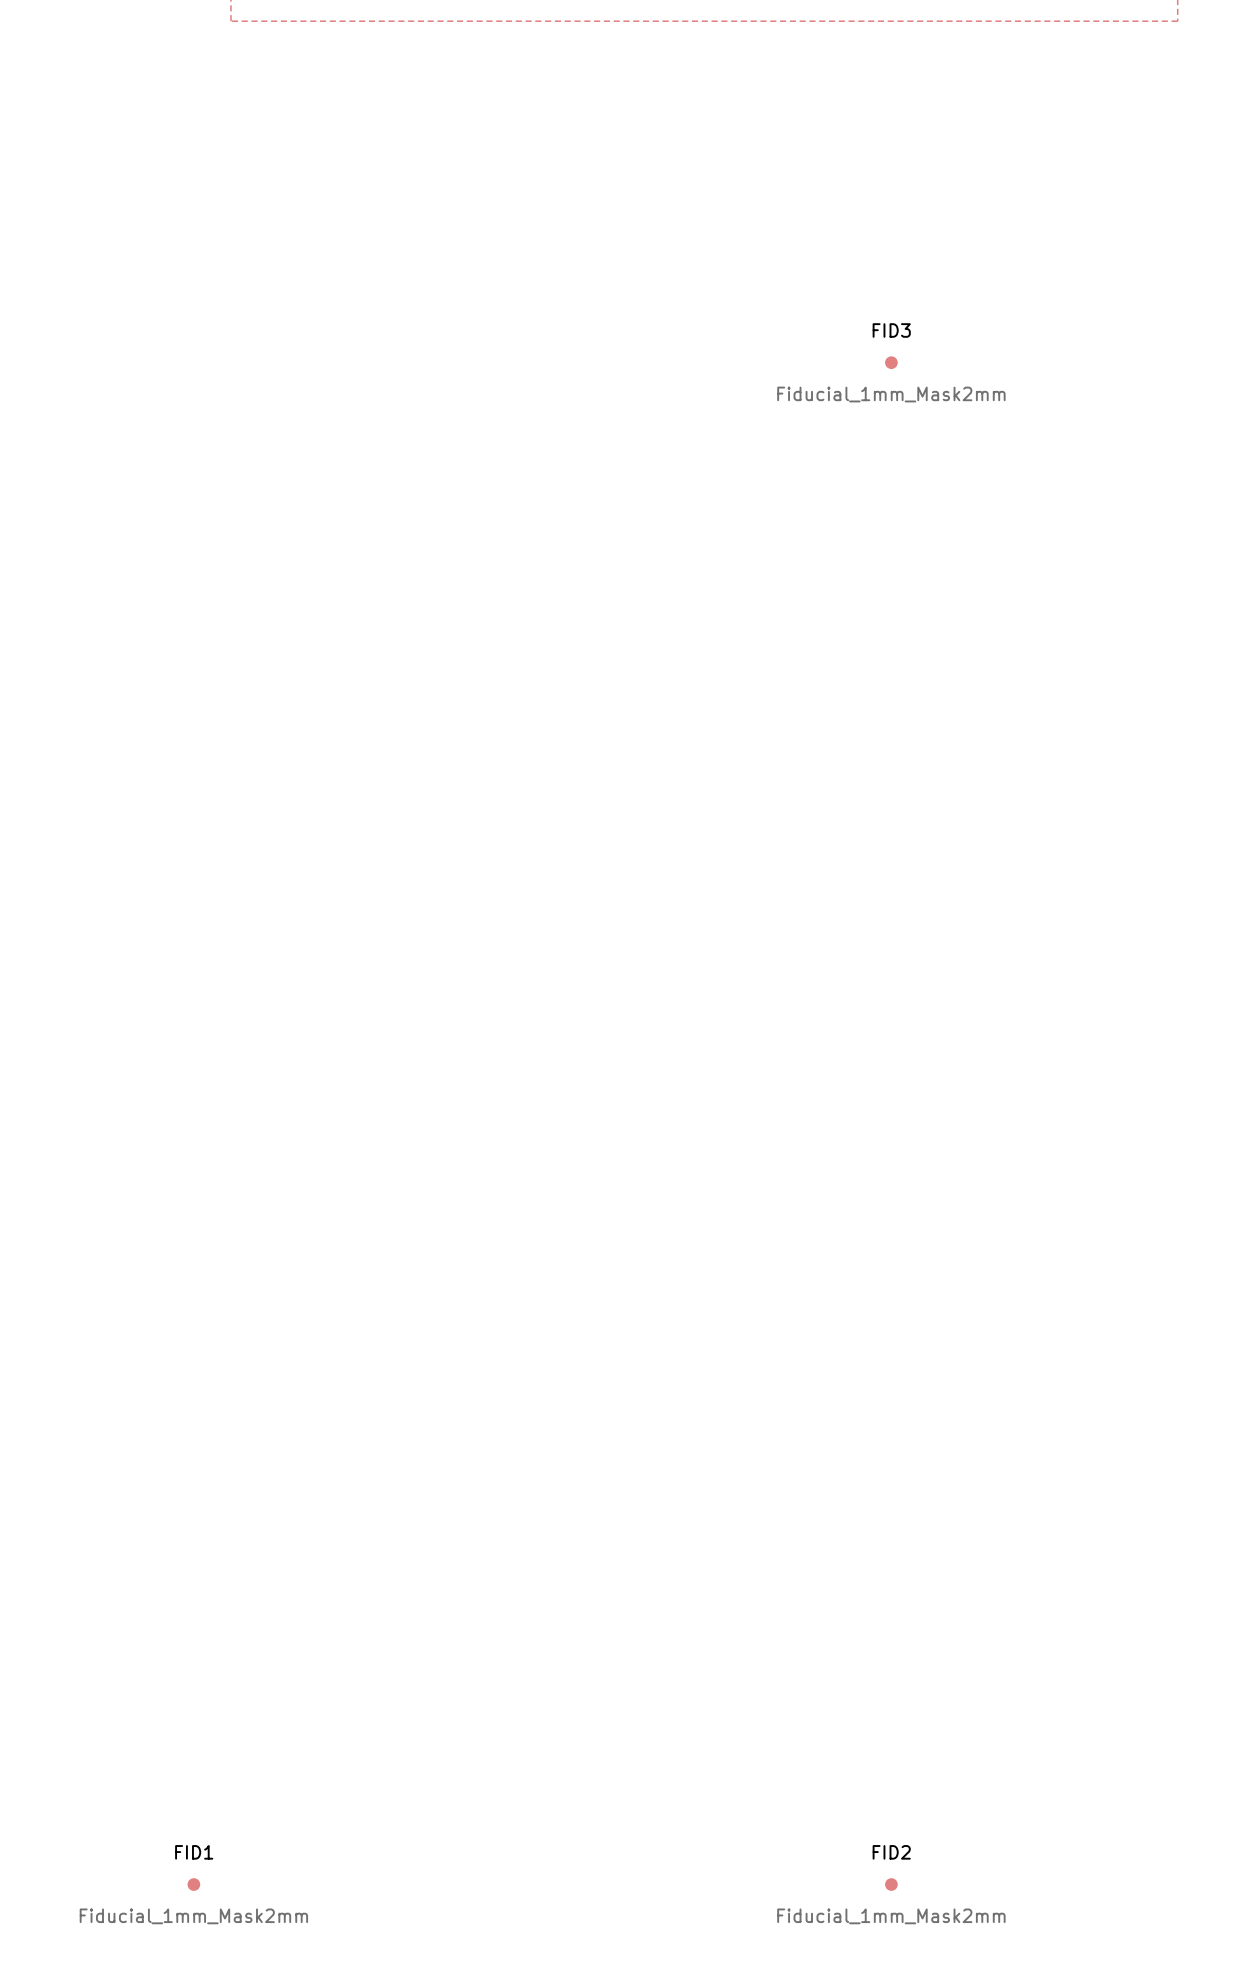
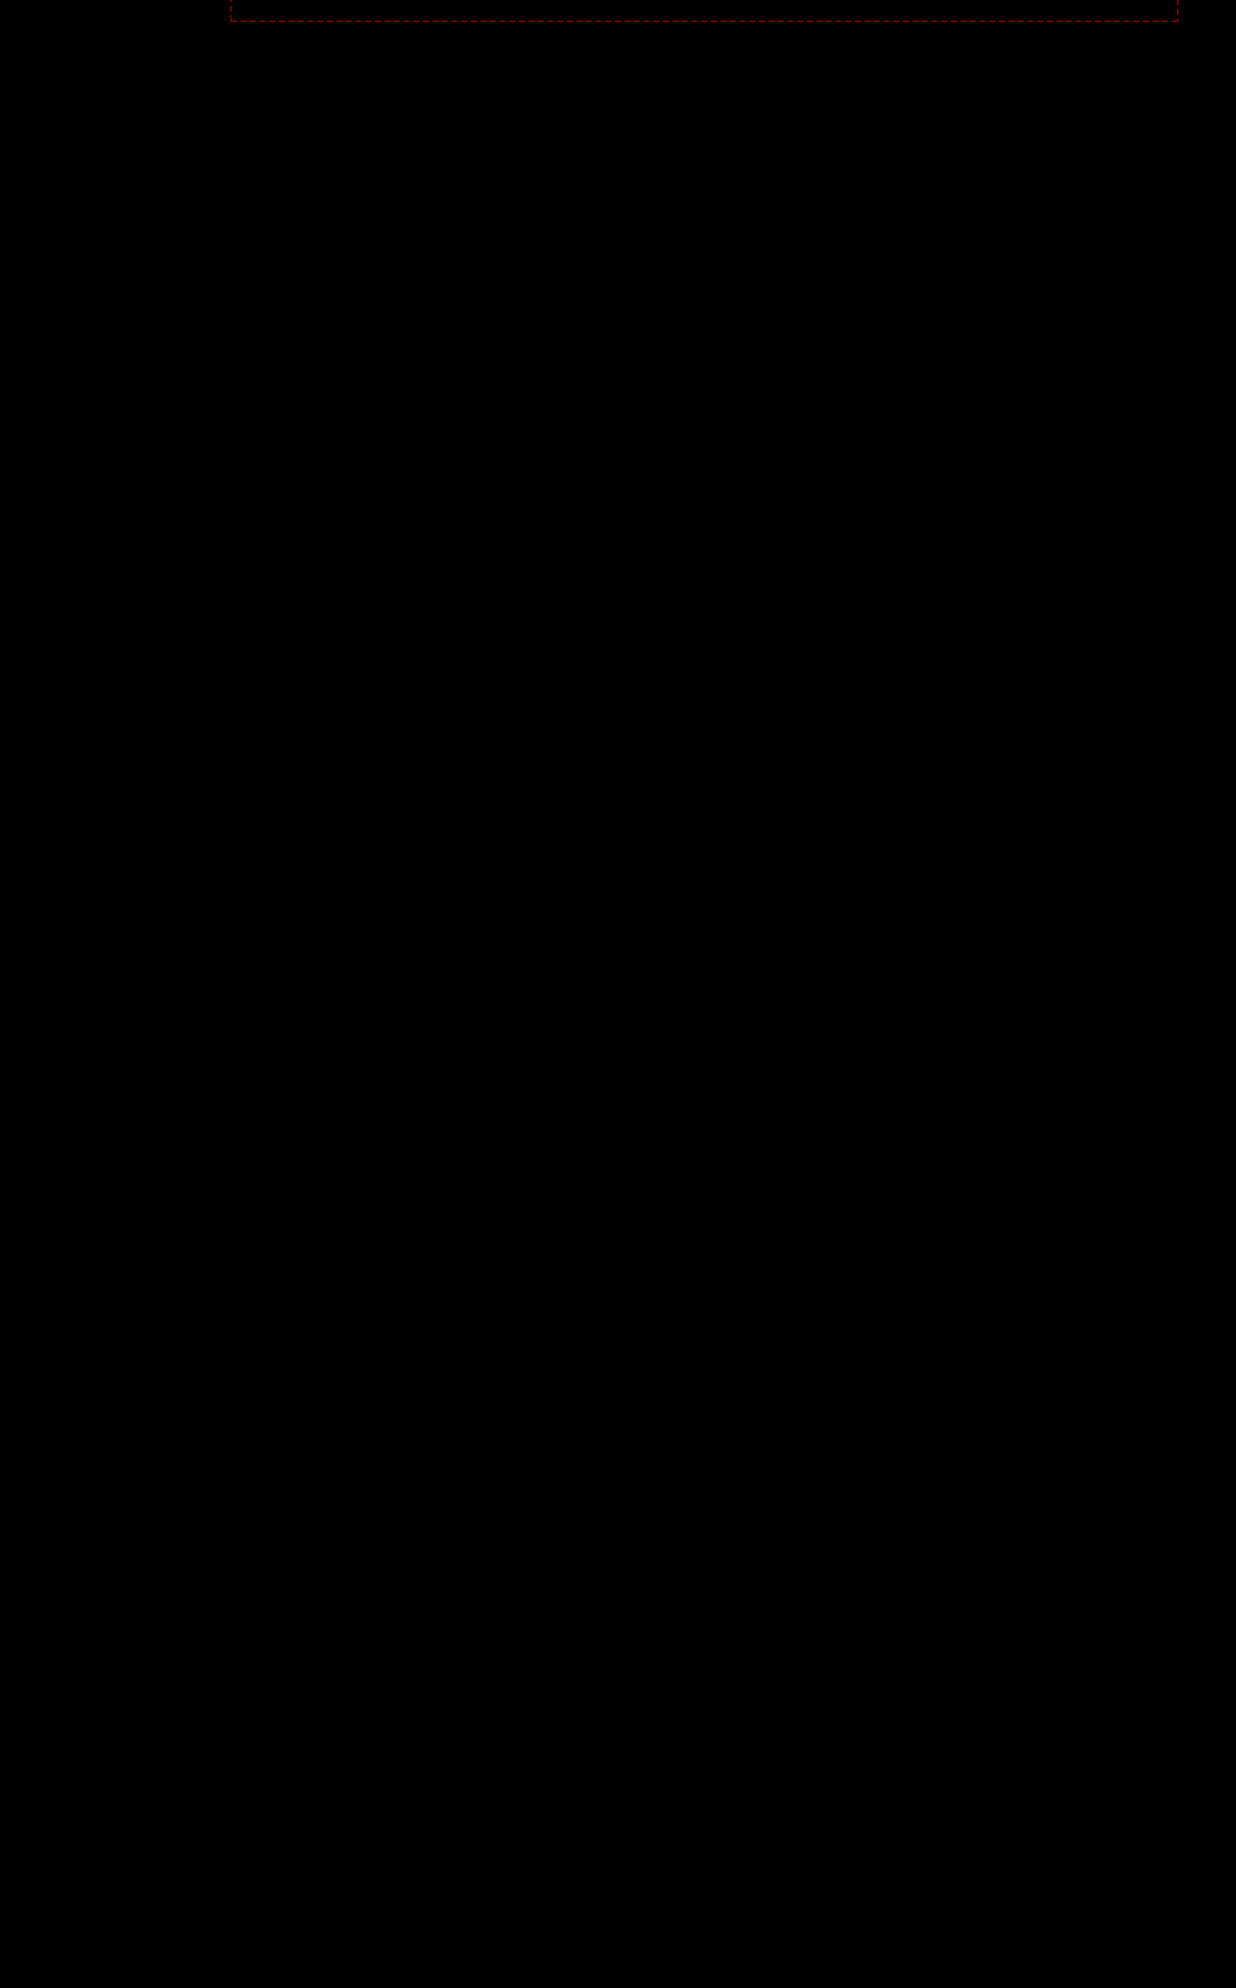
FID3: Fiducial_1mm_Mask2mm (891, 362) -> none
FID1: Fiducial_1mm_Mask2mm (193, 1884) -> none
FID2: Fiducial_1mm_Mask2mm (891, 1884) -> none

